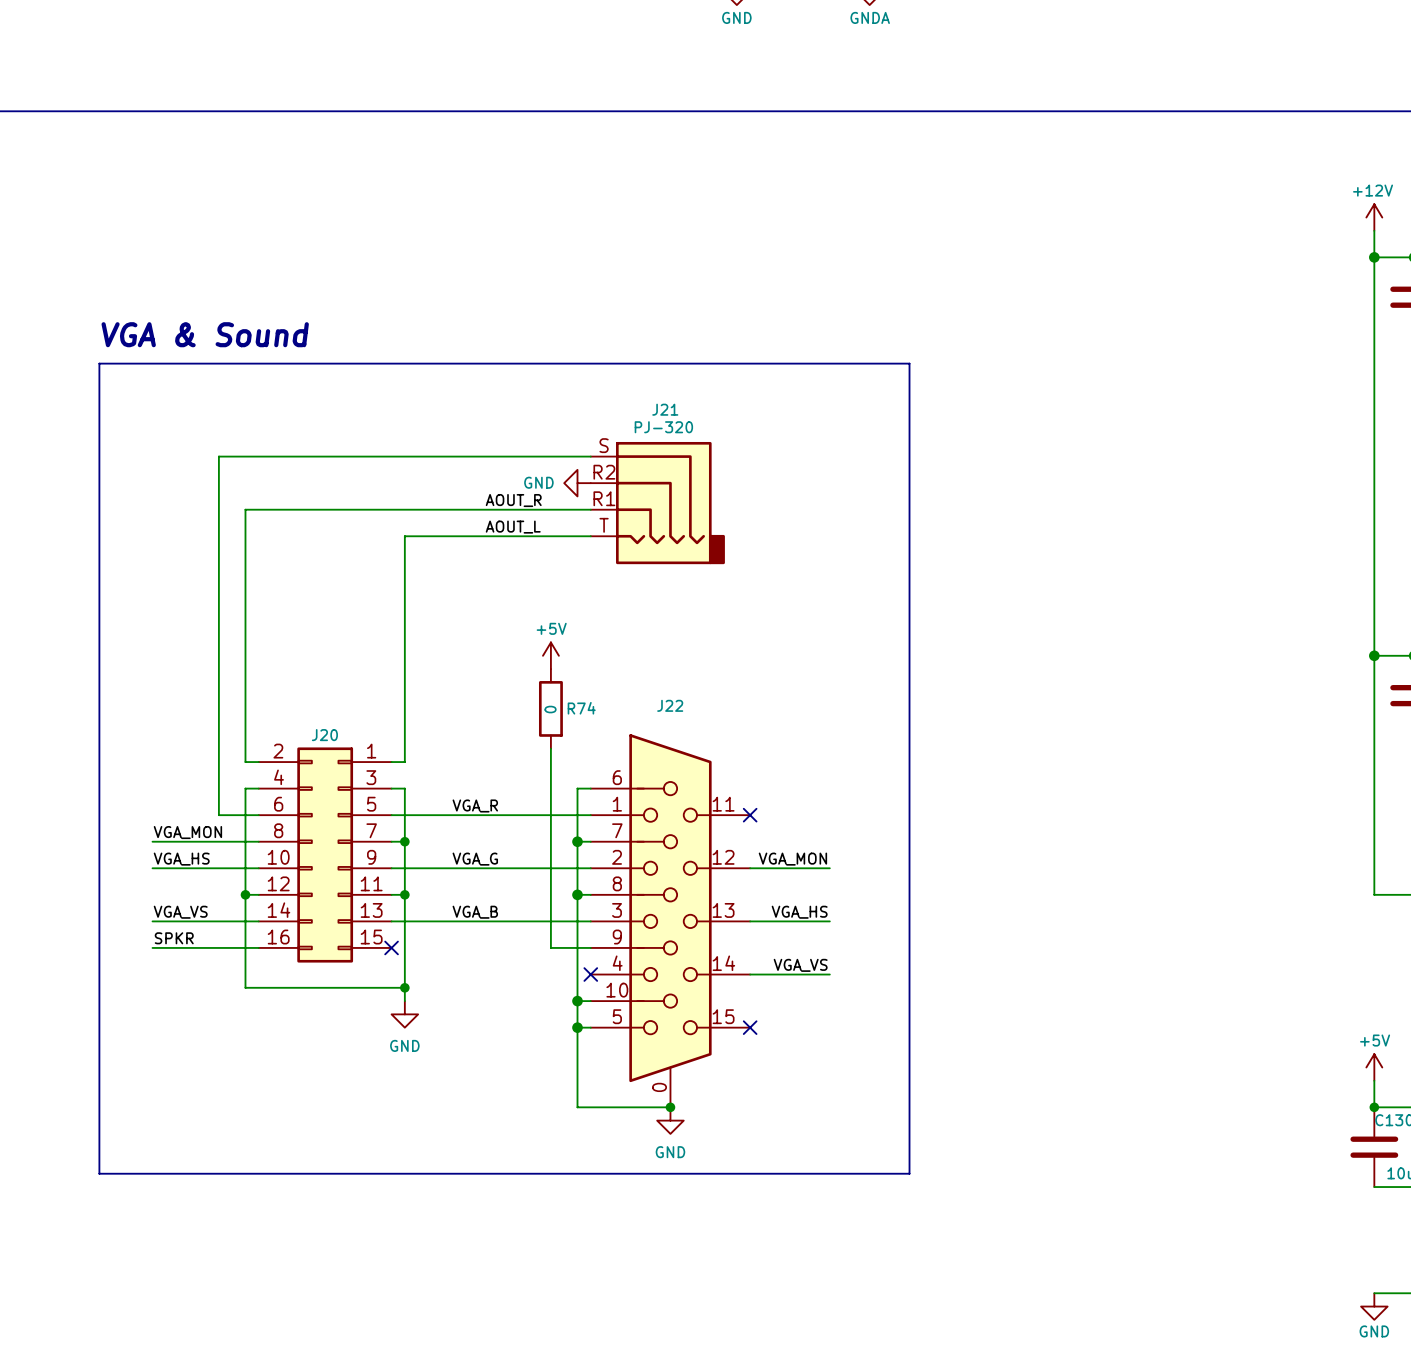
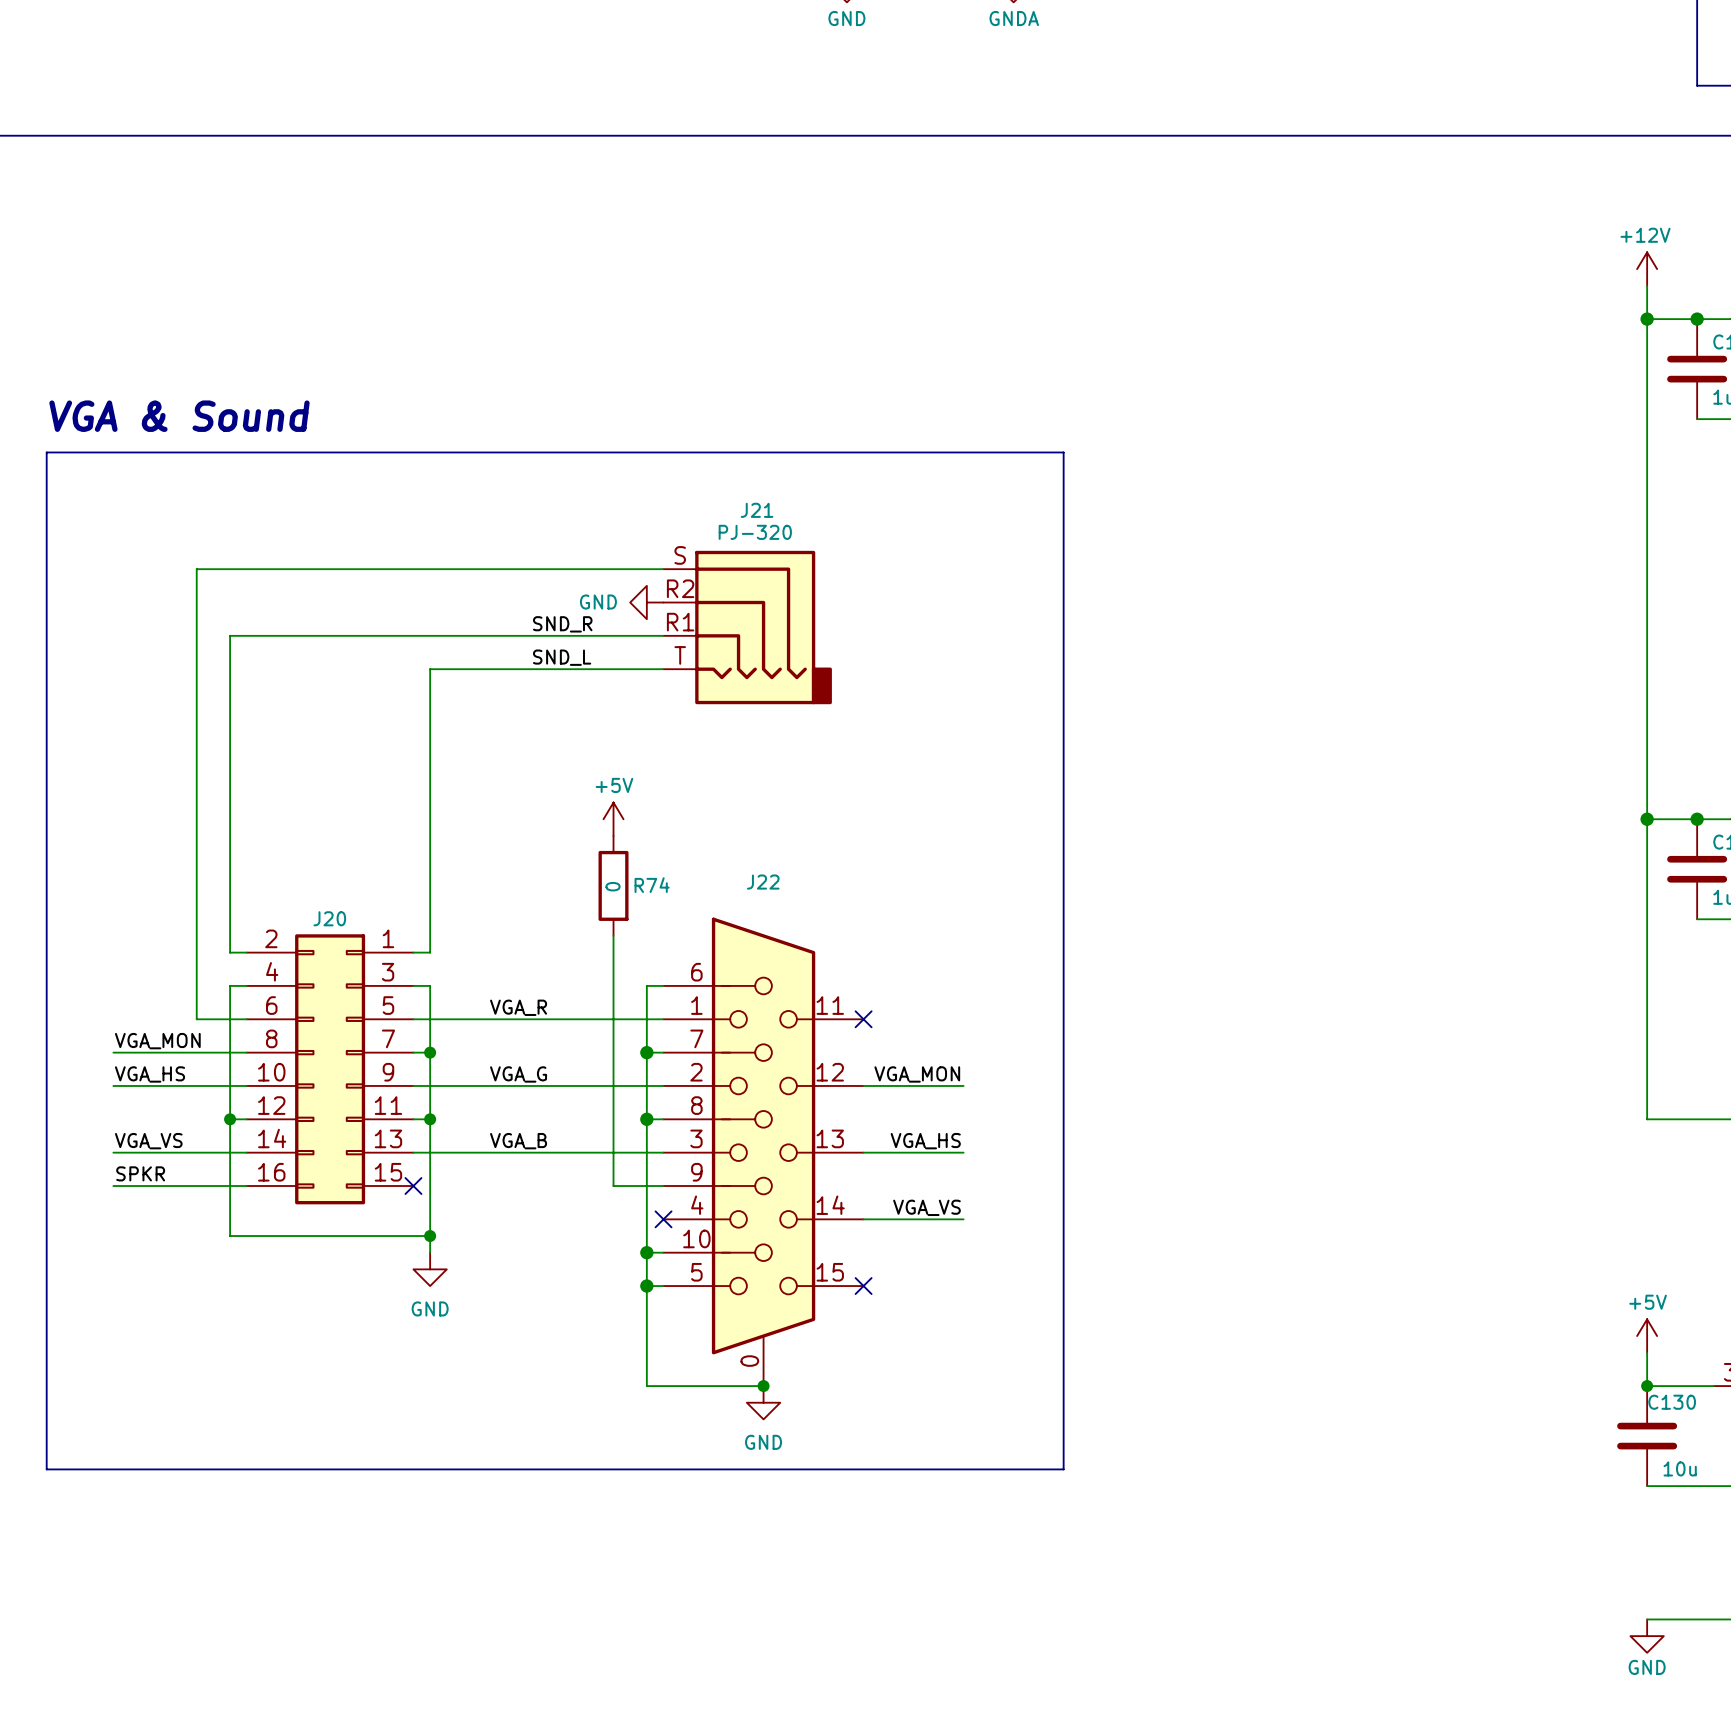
label: AOUT_R (513, 500) -> SND_R (562, 624)
label: AOUT_L (513, 527) -> SND_L (562, 657)

